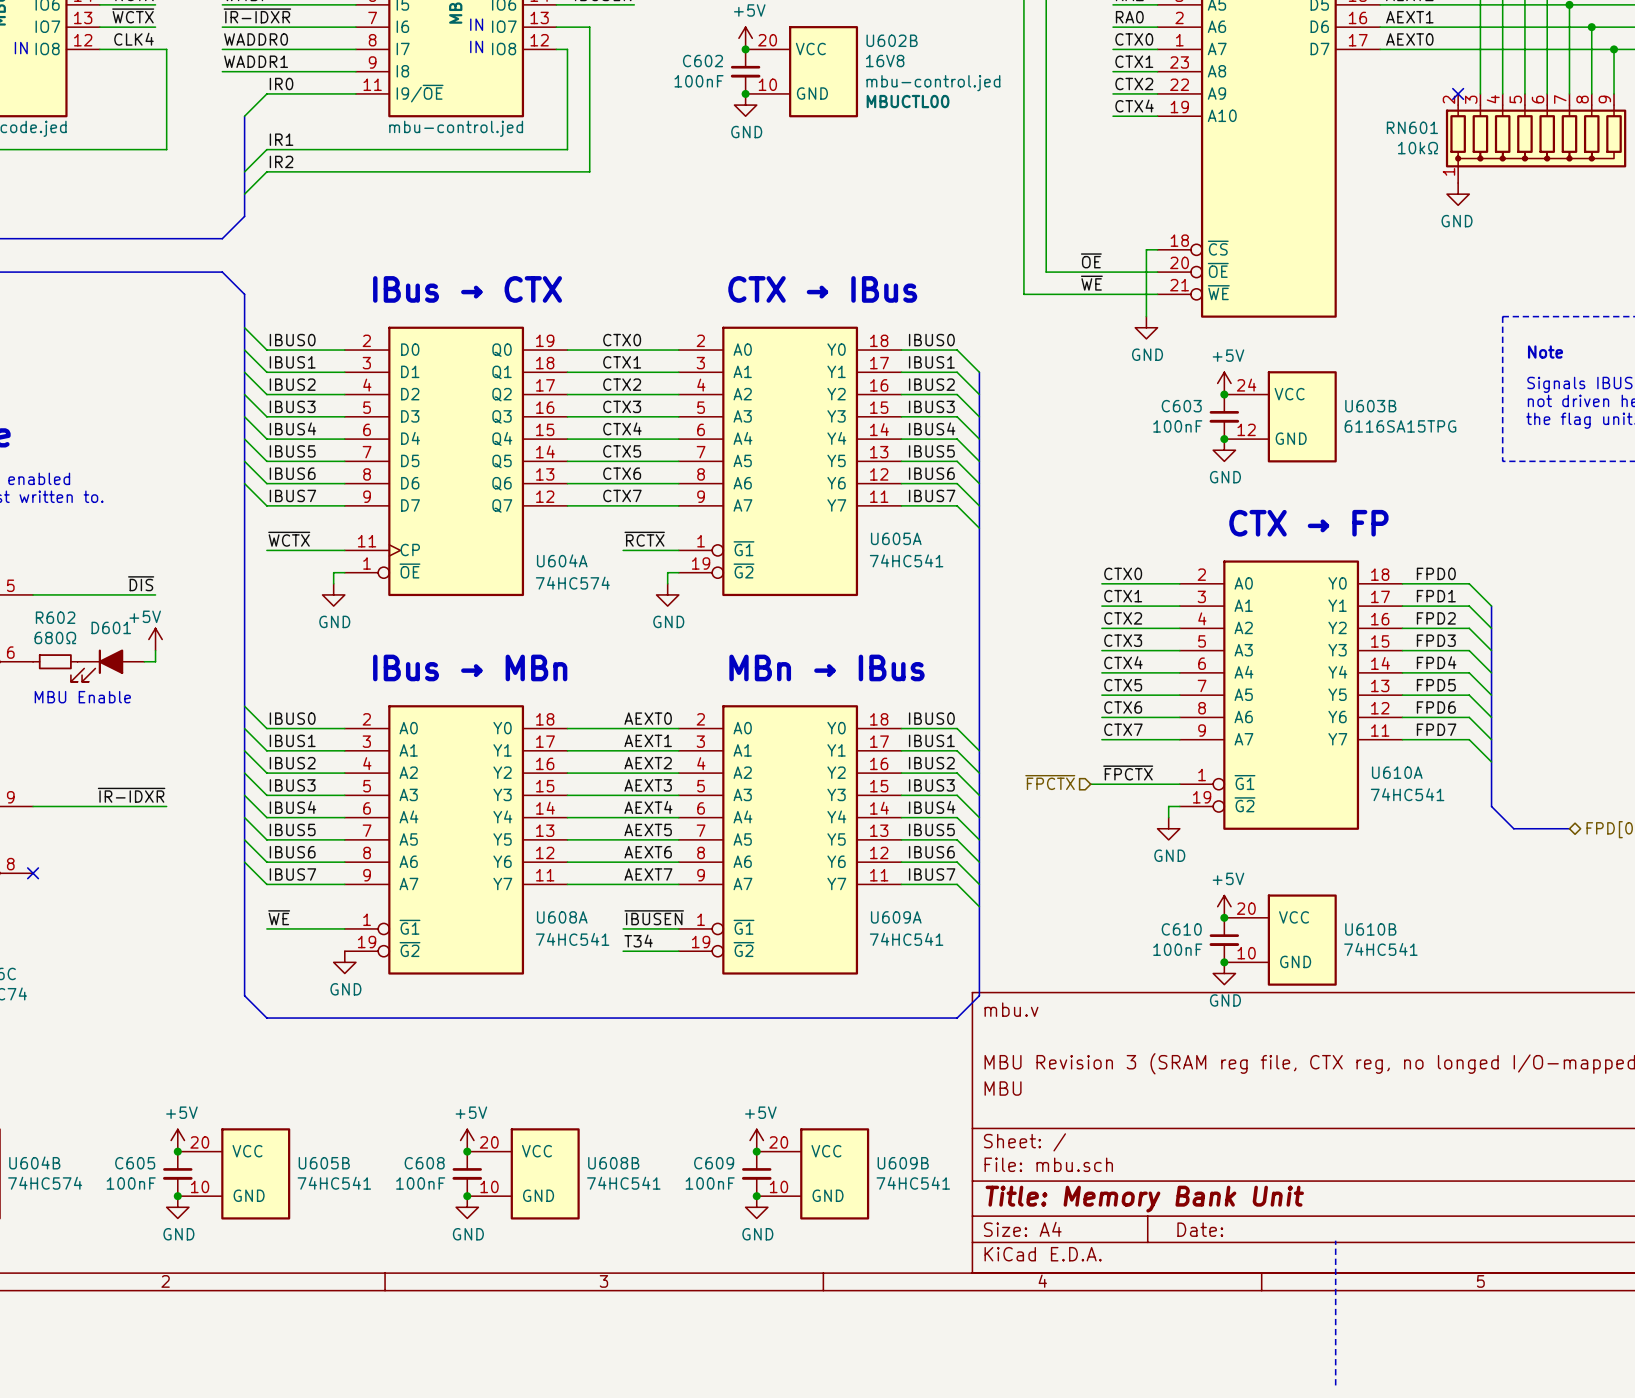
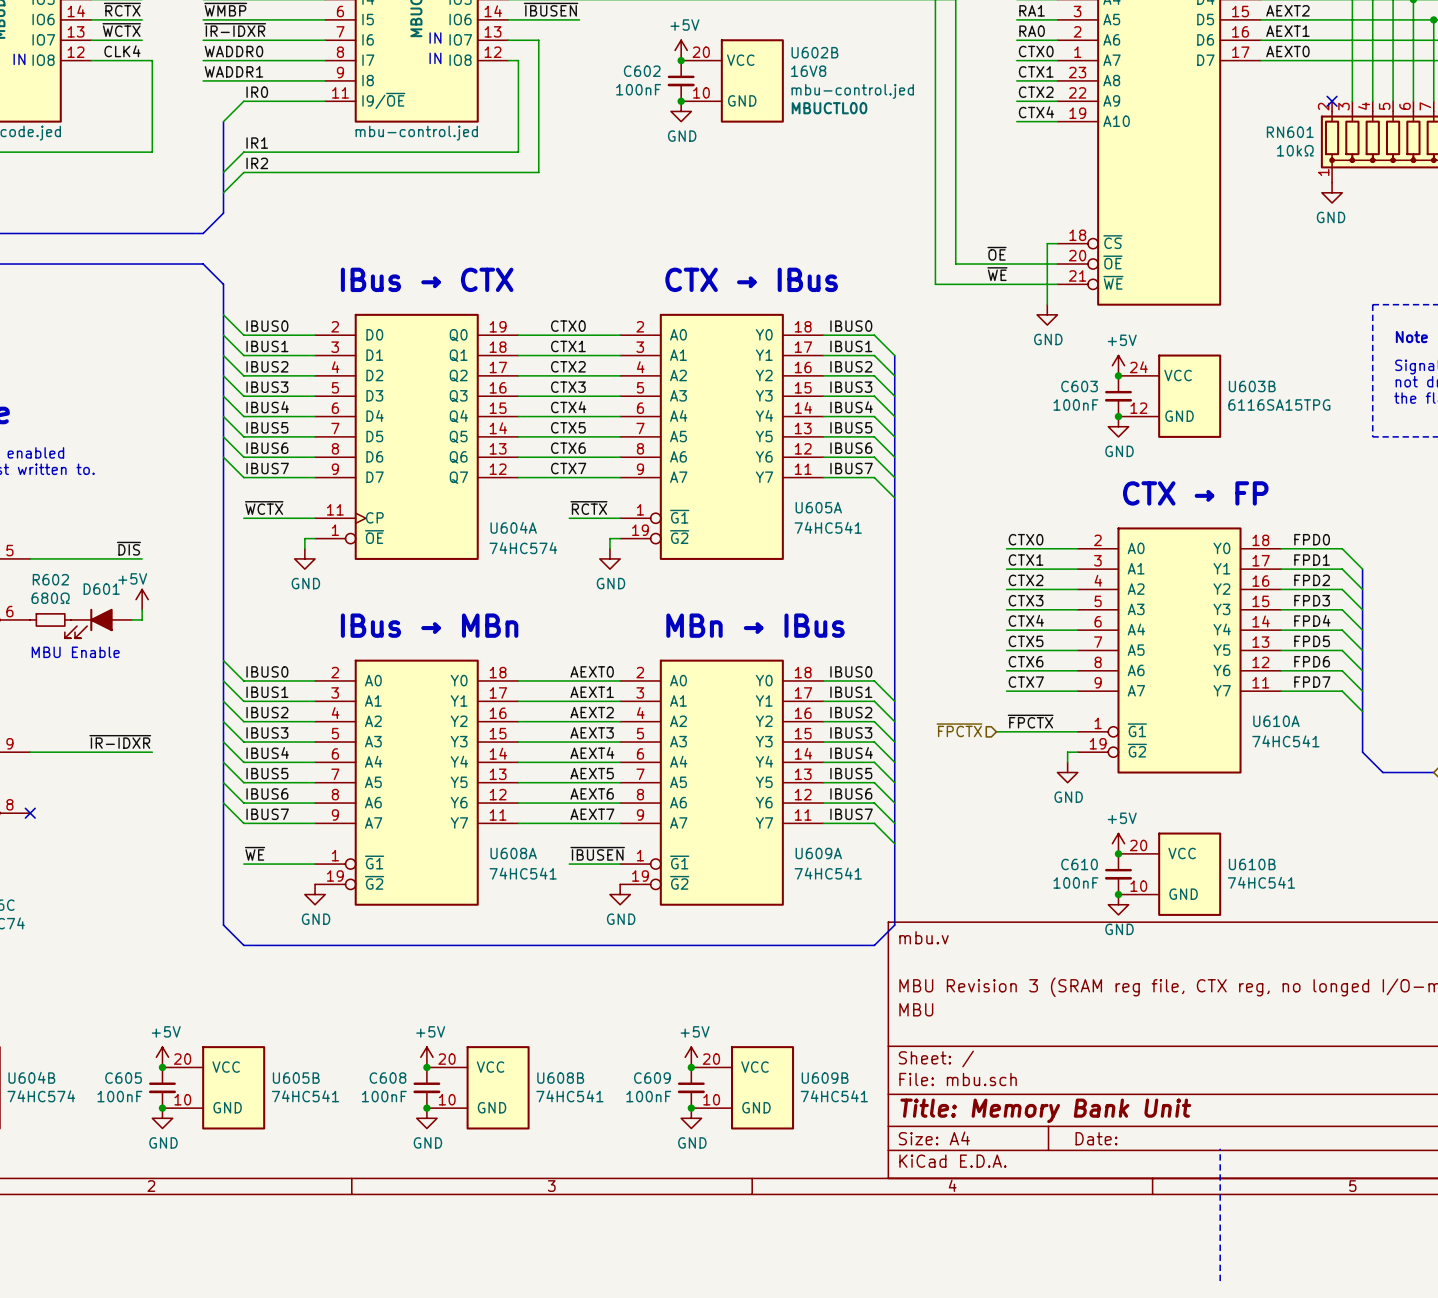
label: T34 (638, 941) -> none
wire: (623, 951) (678, 951) -> none
power symbol: none -> GND (620, 894)

